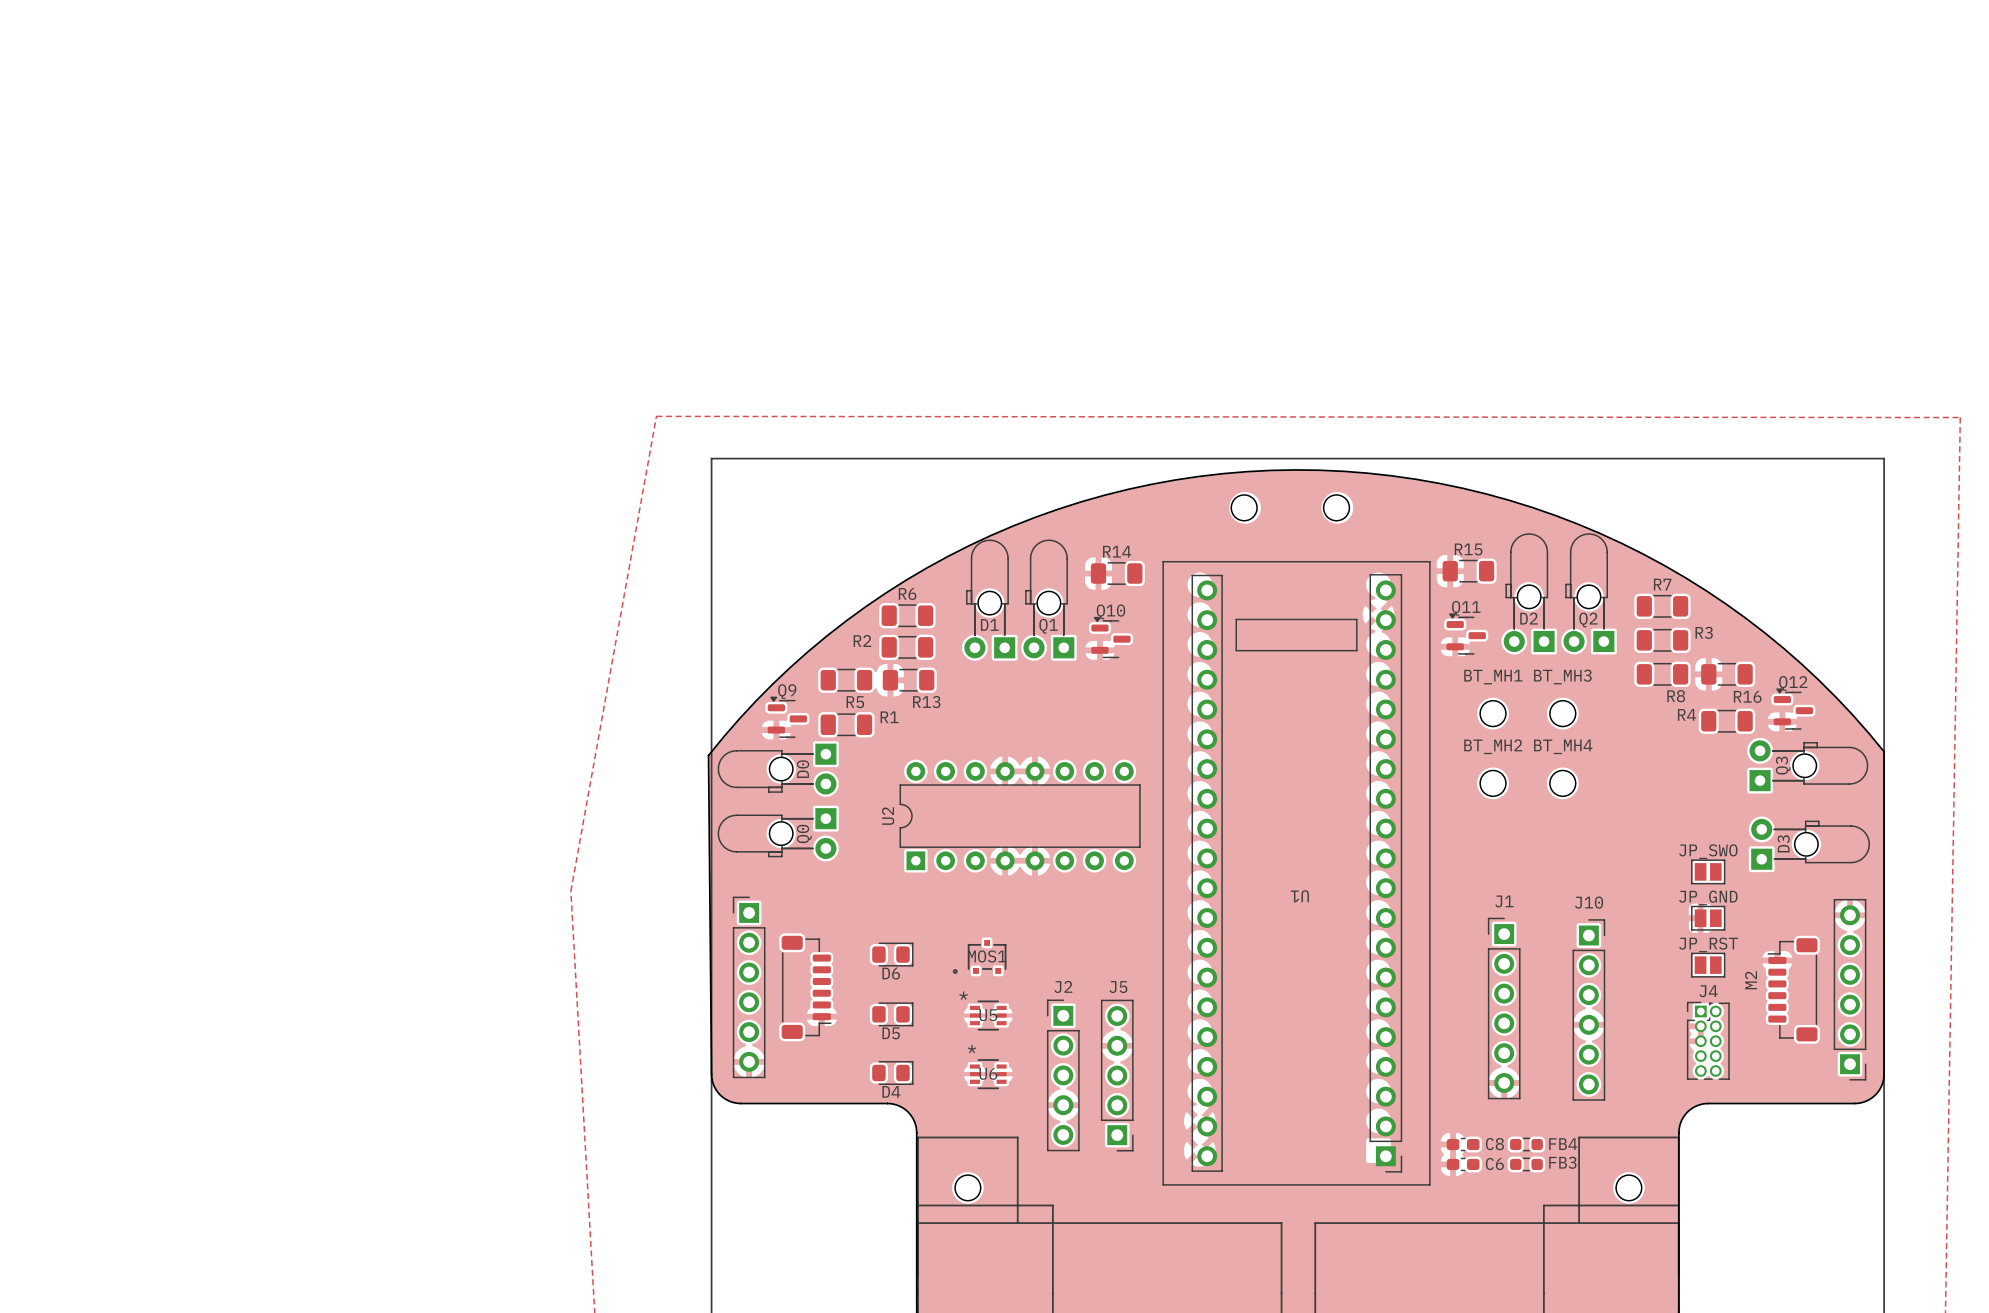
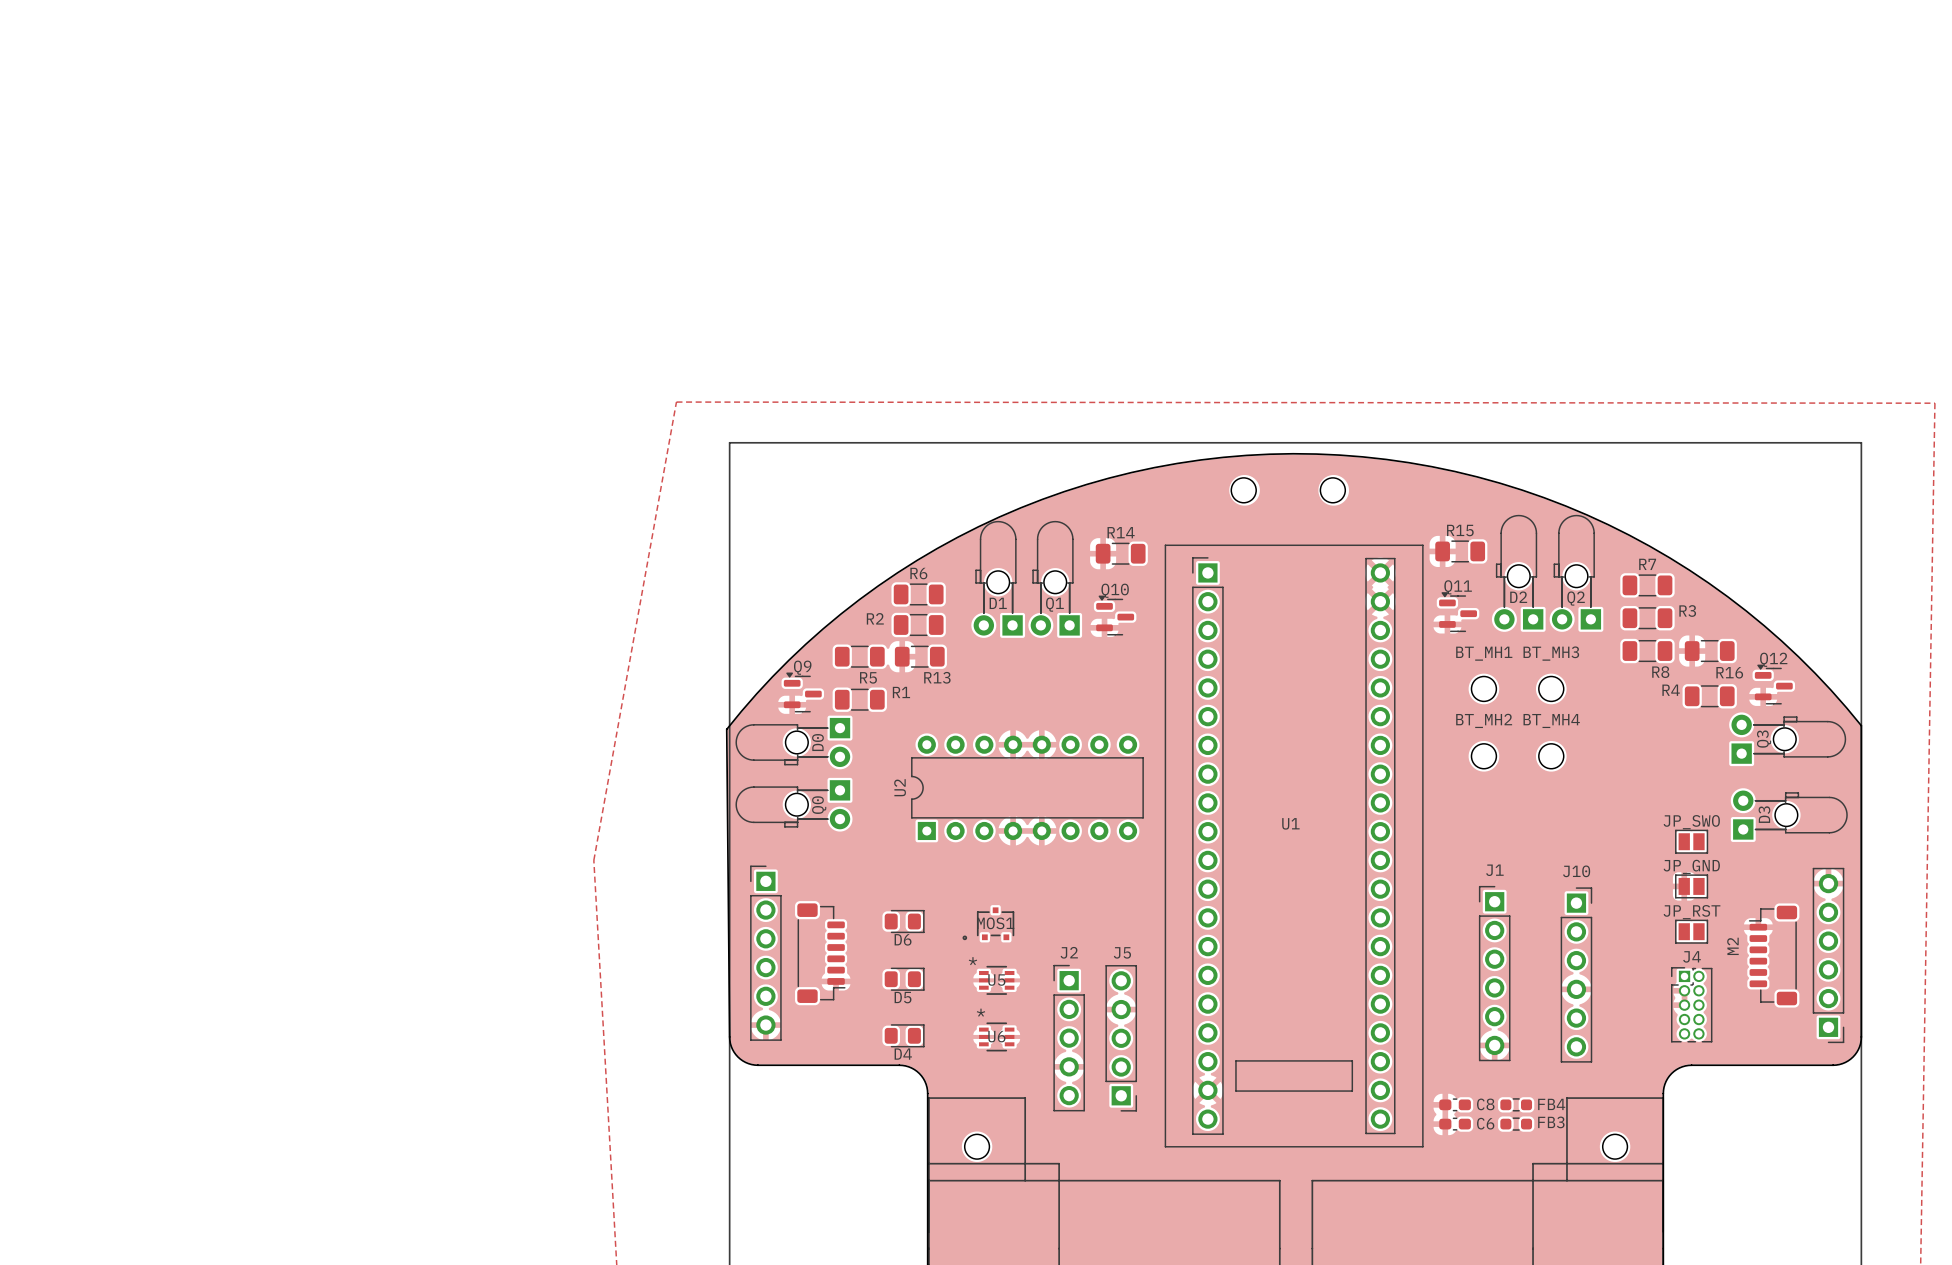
U1 rotation: 0° (1296, 873) -> 180° (1294, 846)

